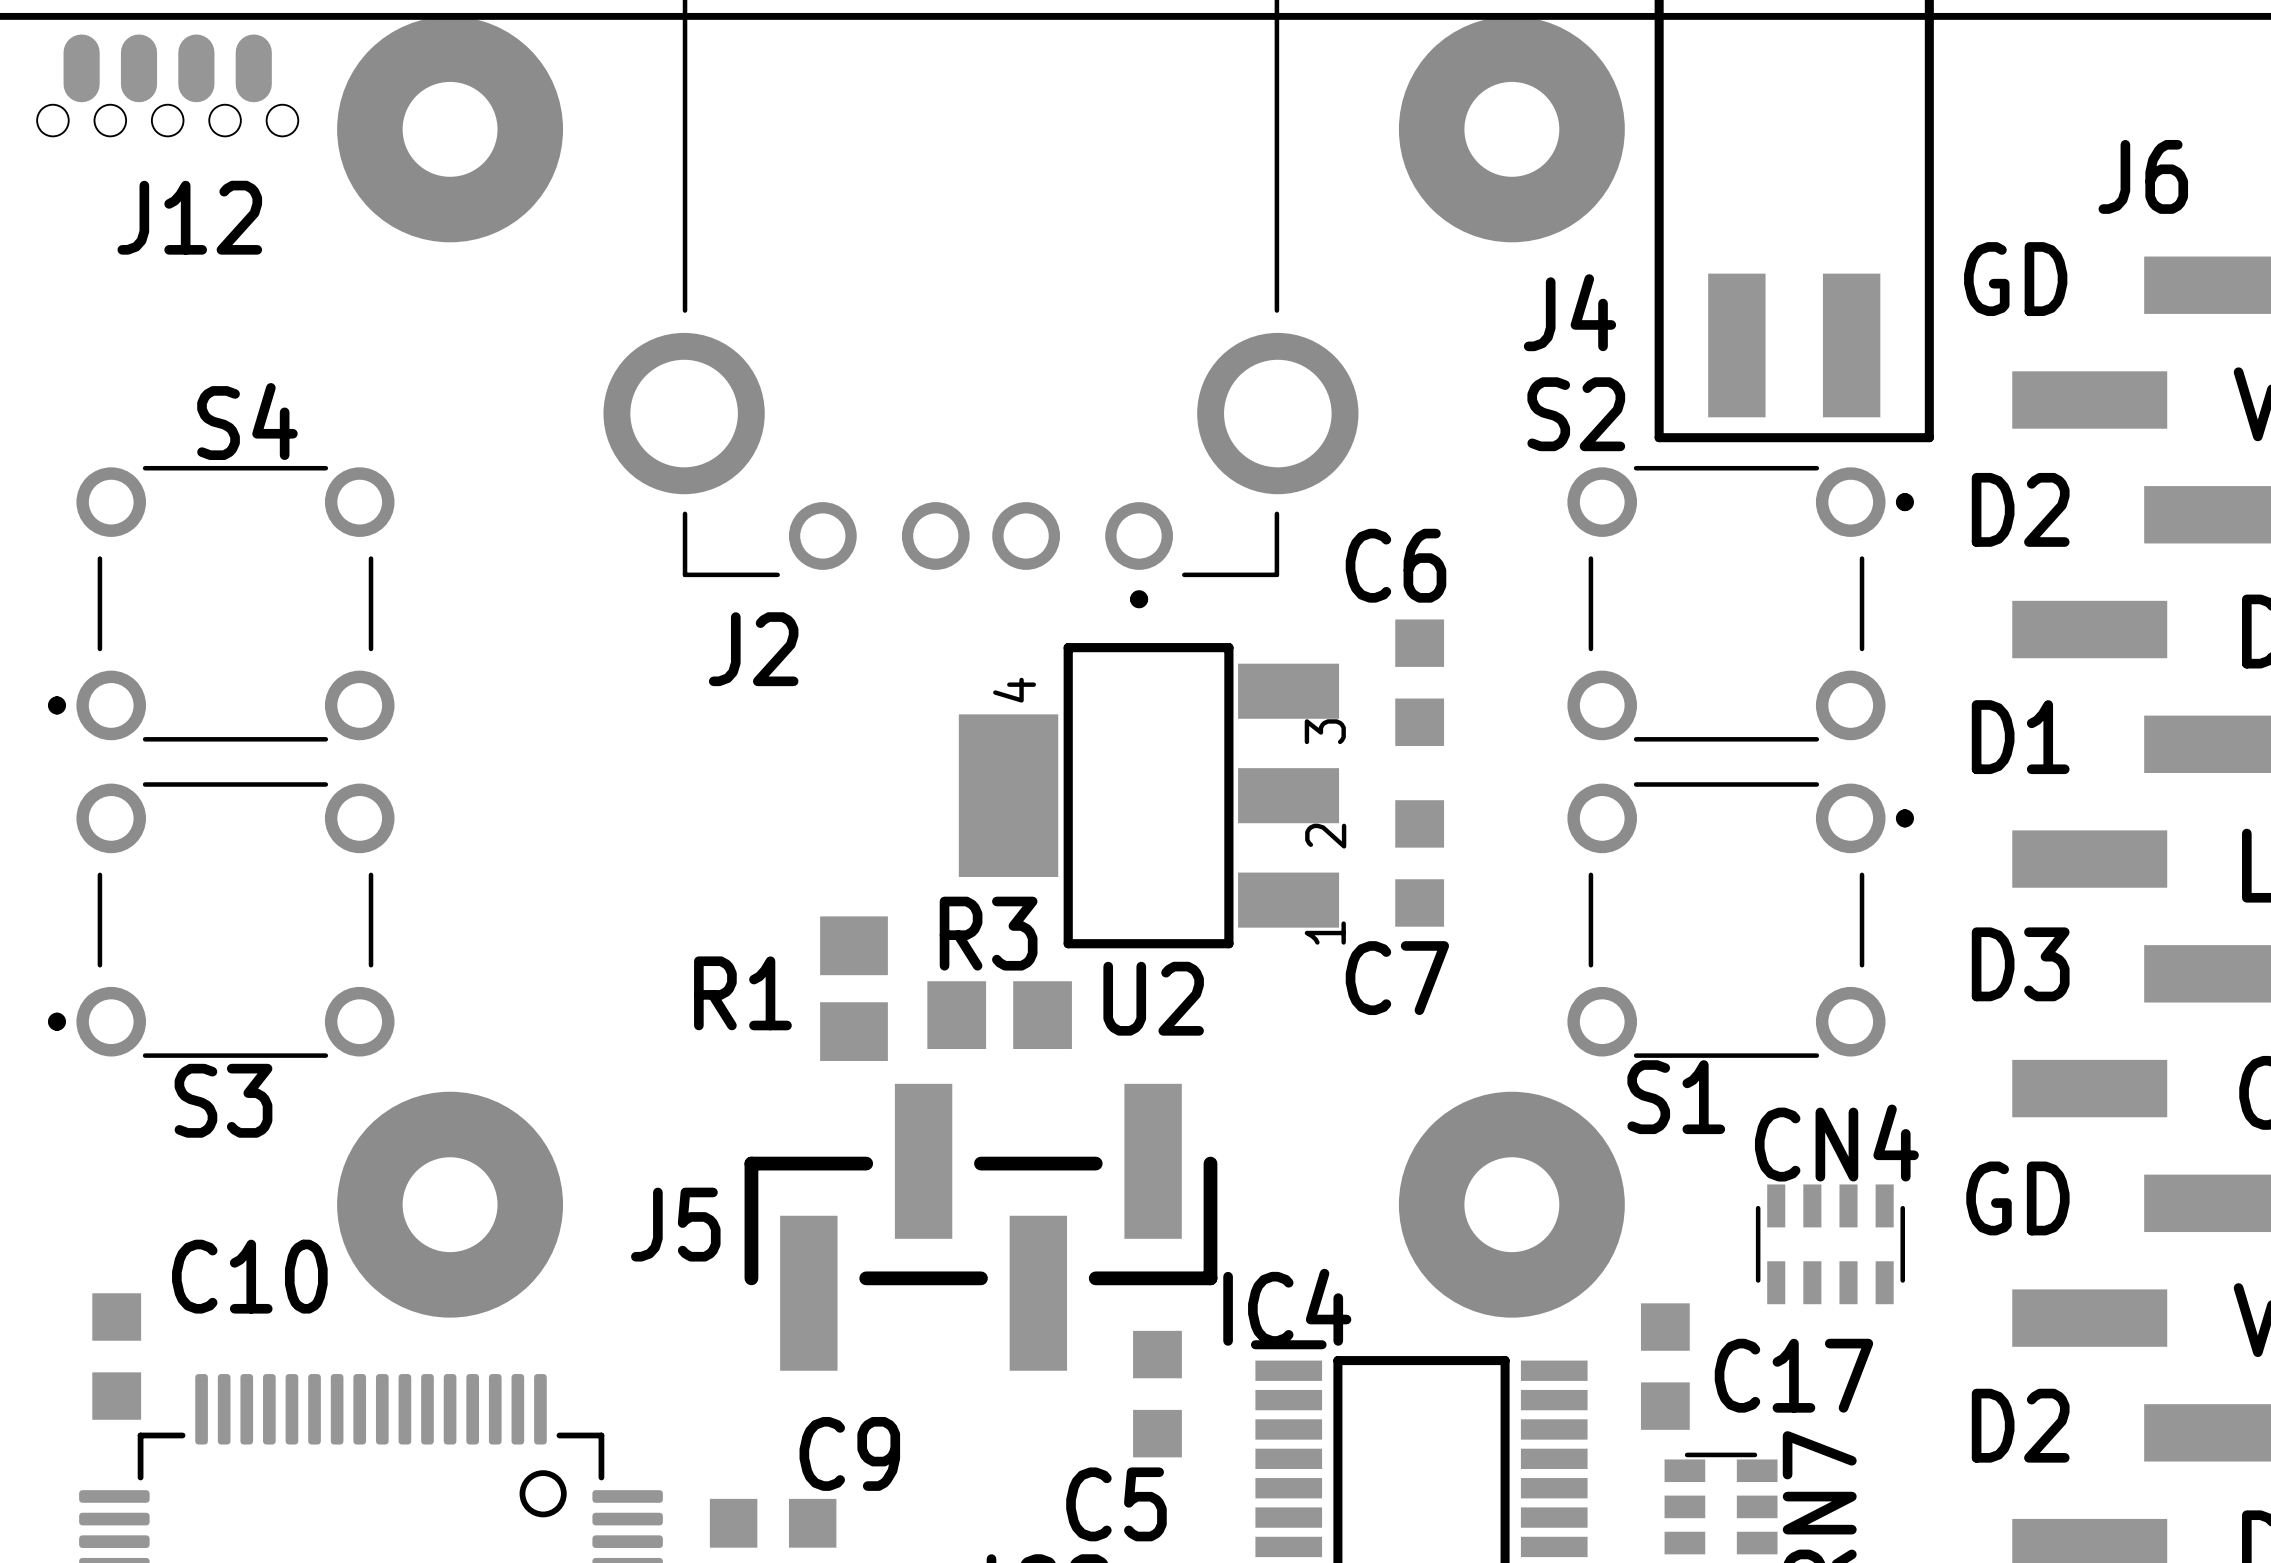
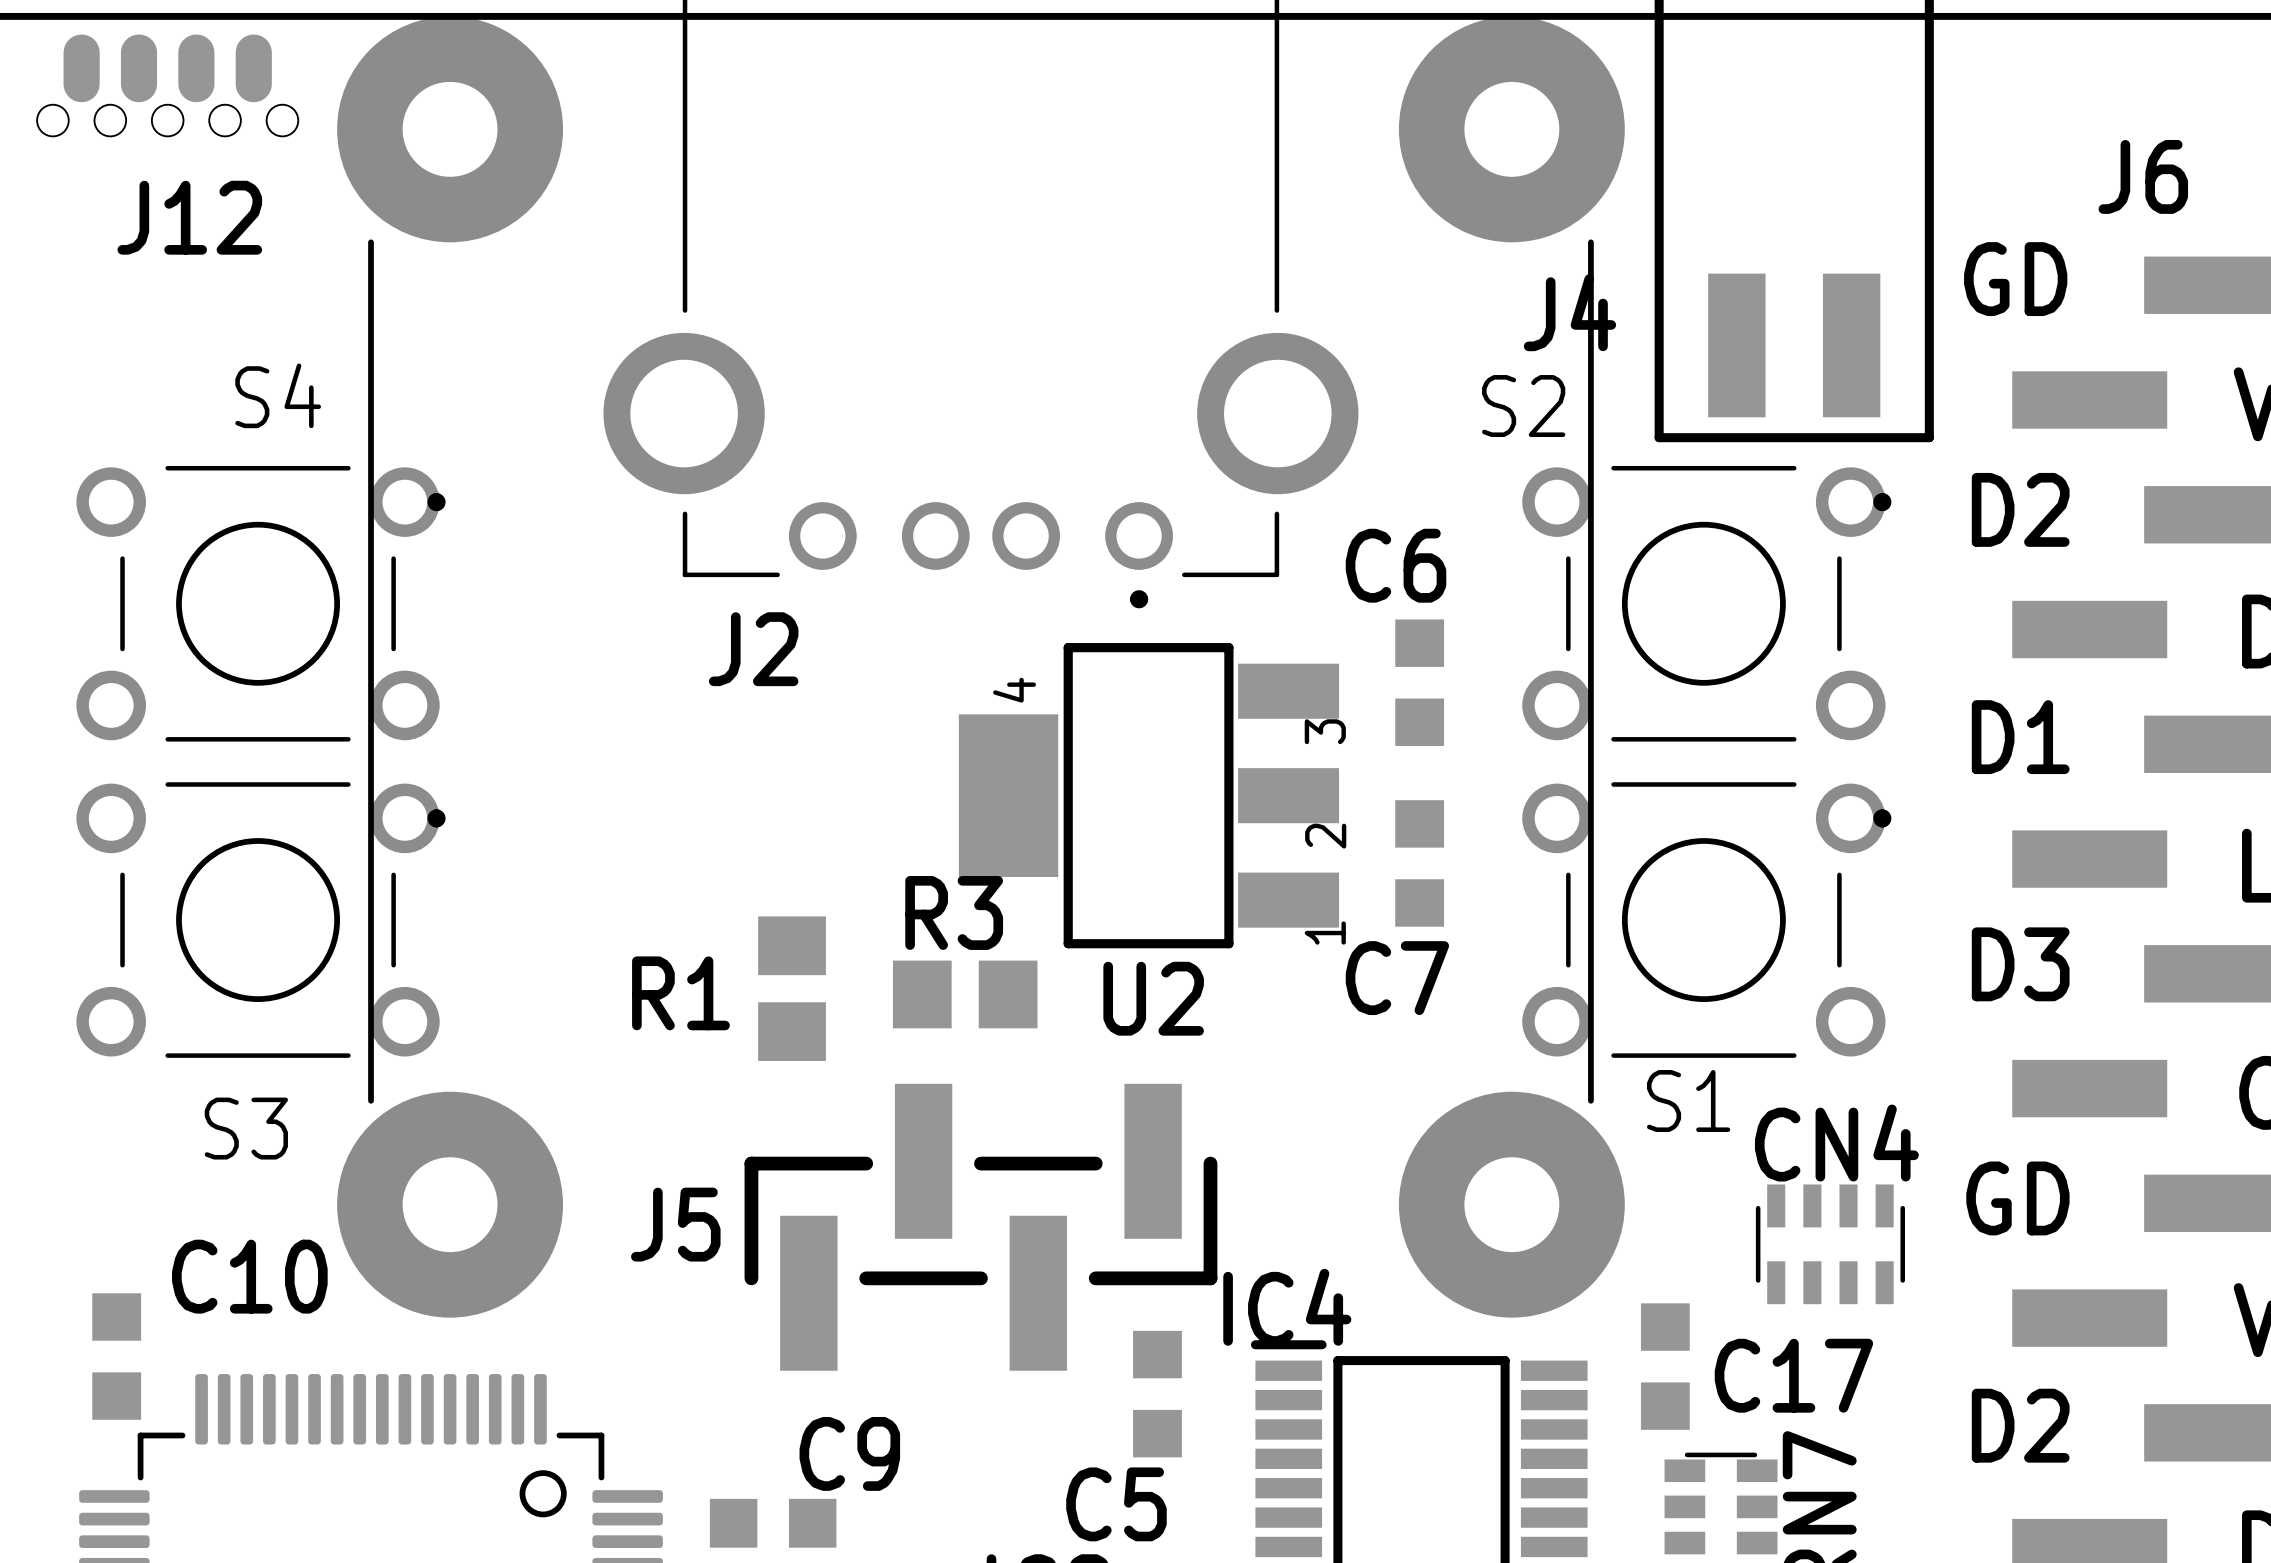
J5 footprint: [337, 16, 1625, 1371] -> [337, 16, 1625, 1371]
S4 footprint: [47, 465, 395, 742] -> [76, 465, 446, 742]
S2 footprint: [1567, 465, 1914, 742] -> [1522, 465, 1892, 742]
S3 footprint: [47, 782, 395, 1058] -> [76, 782, 446, 1058]
S1 footprint: [1567, 782, 1914, 1058] -> [1522, 782, 1892, 1058]
R1 position: (854, 988) -> (792, 988)
R3 position: (999, 1015) -> (965, 994)

